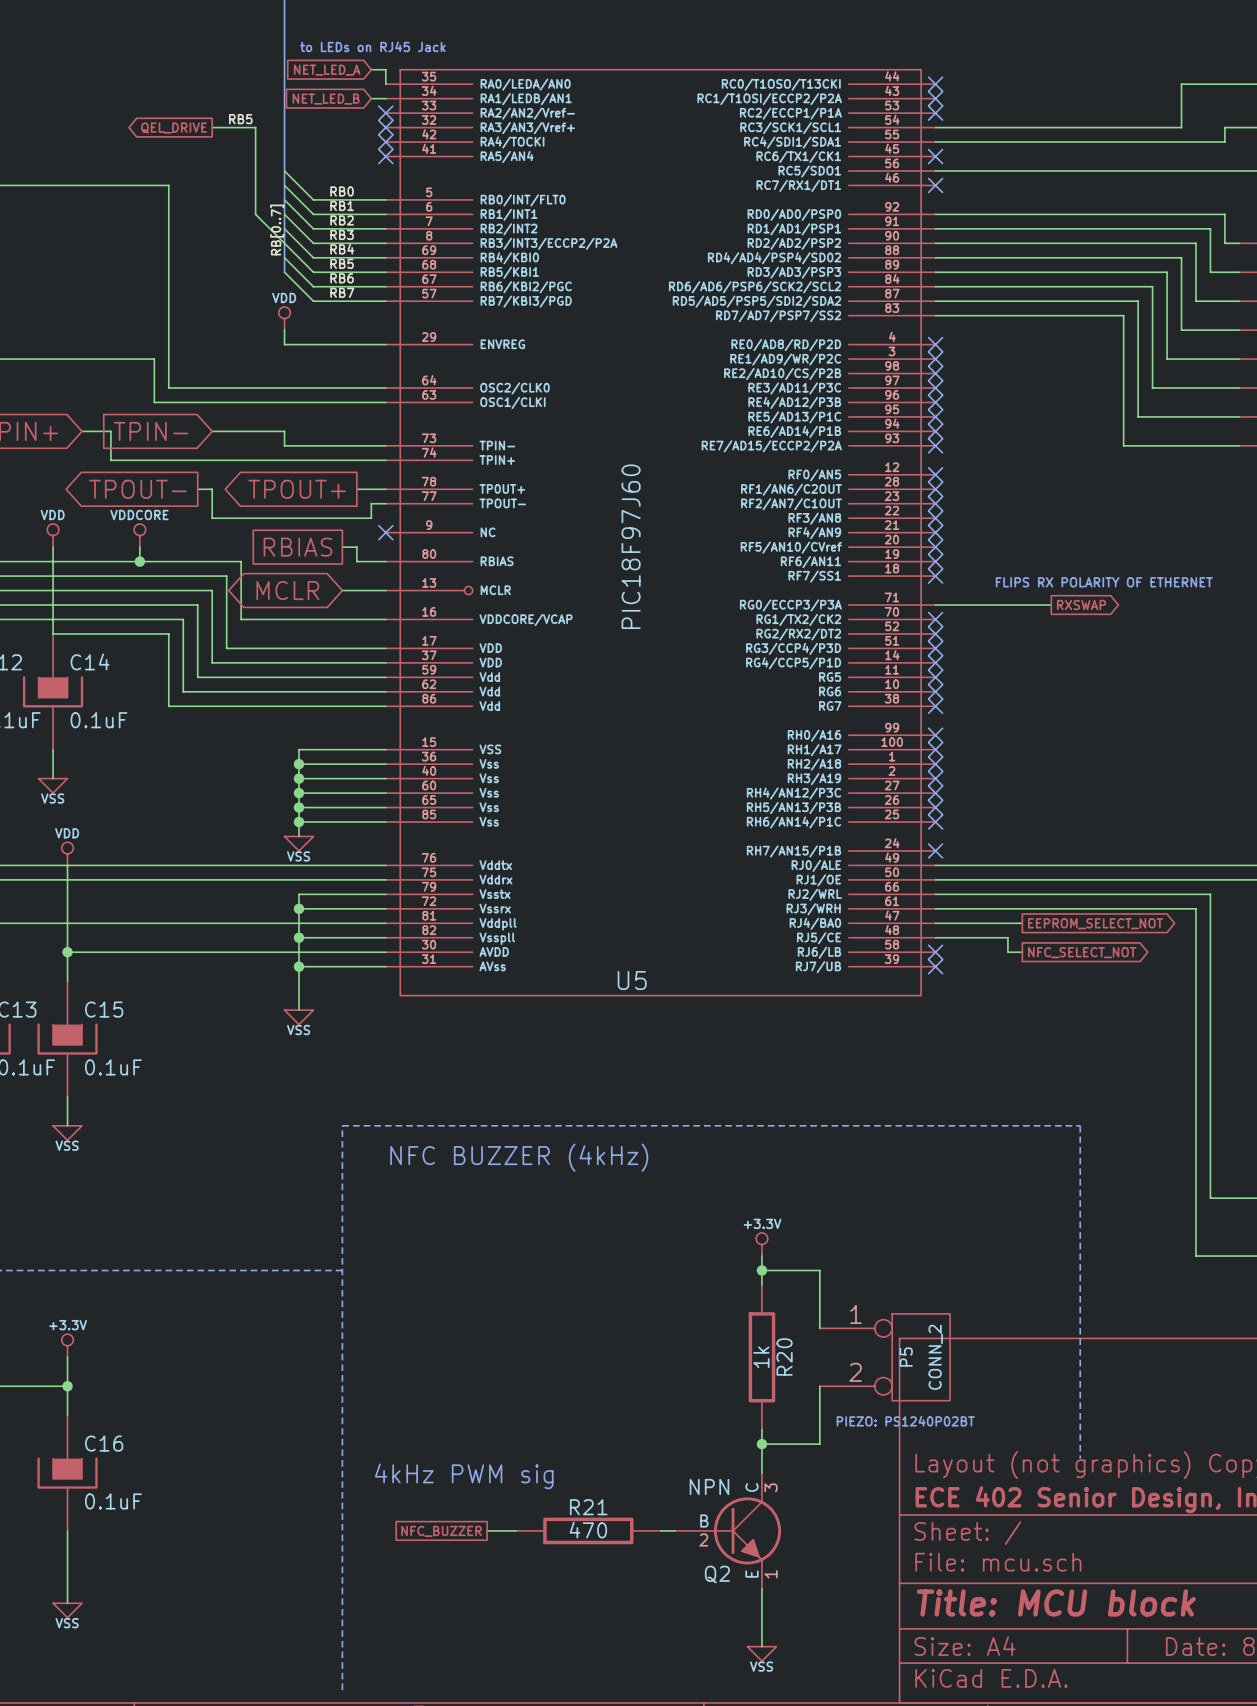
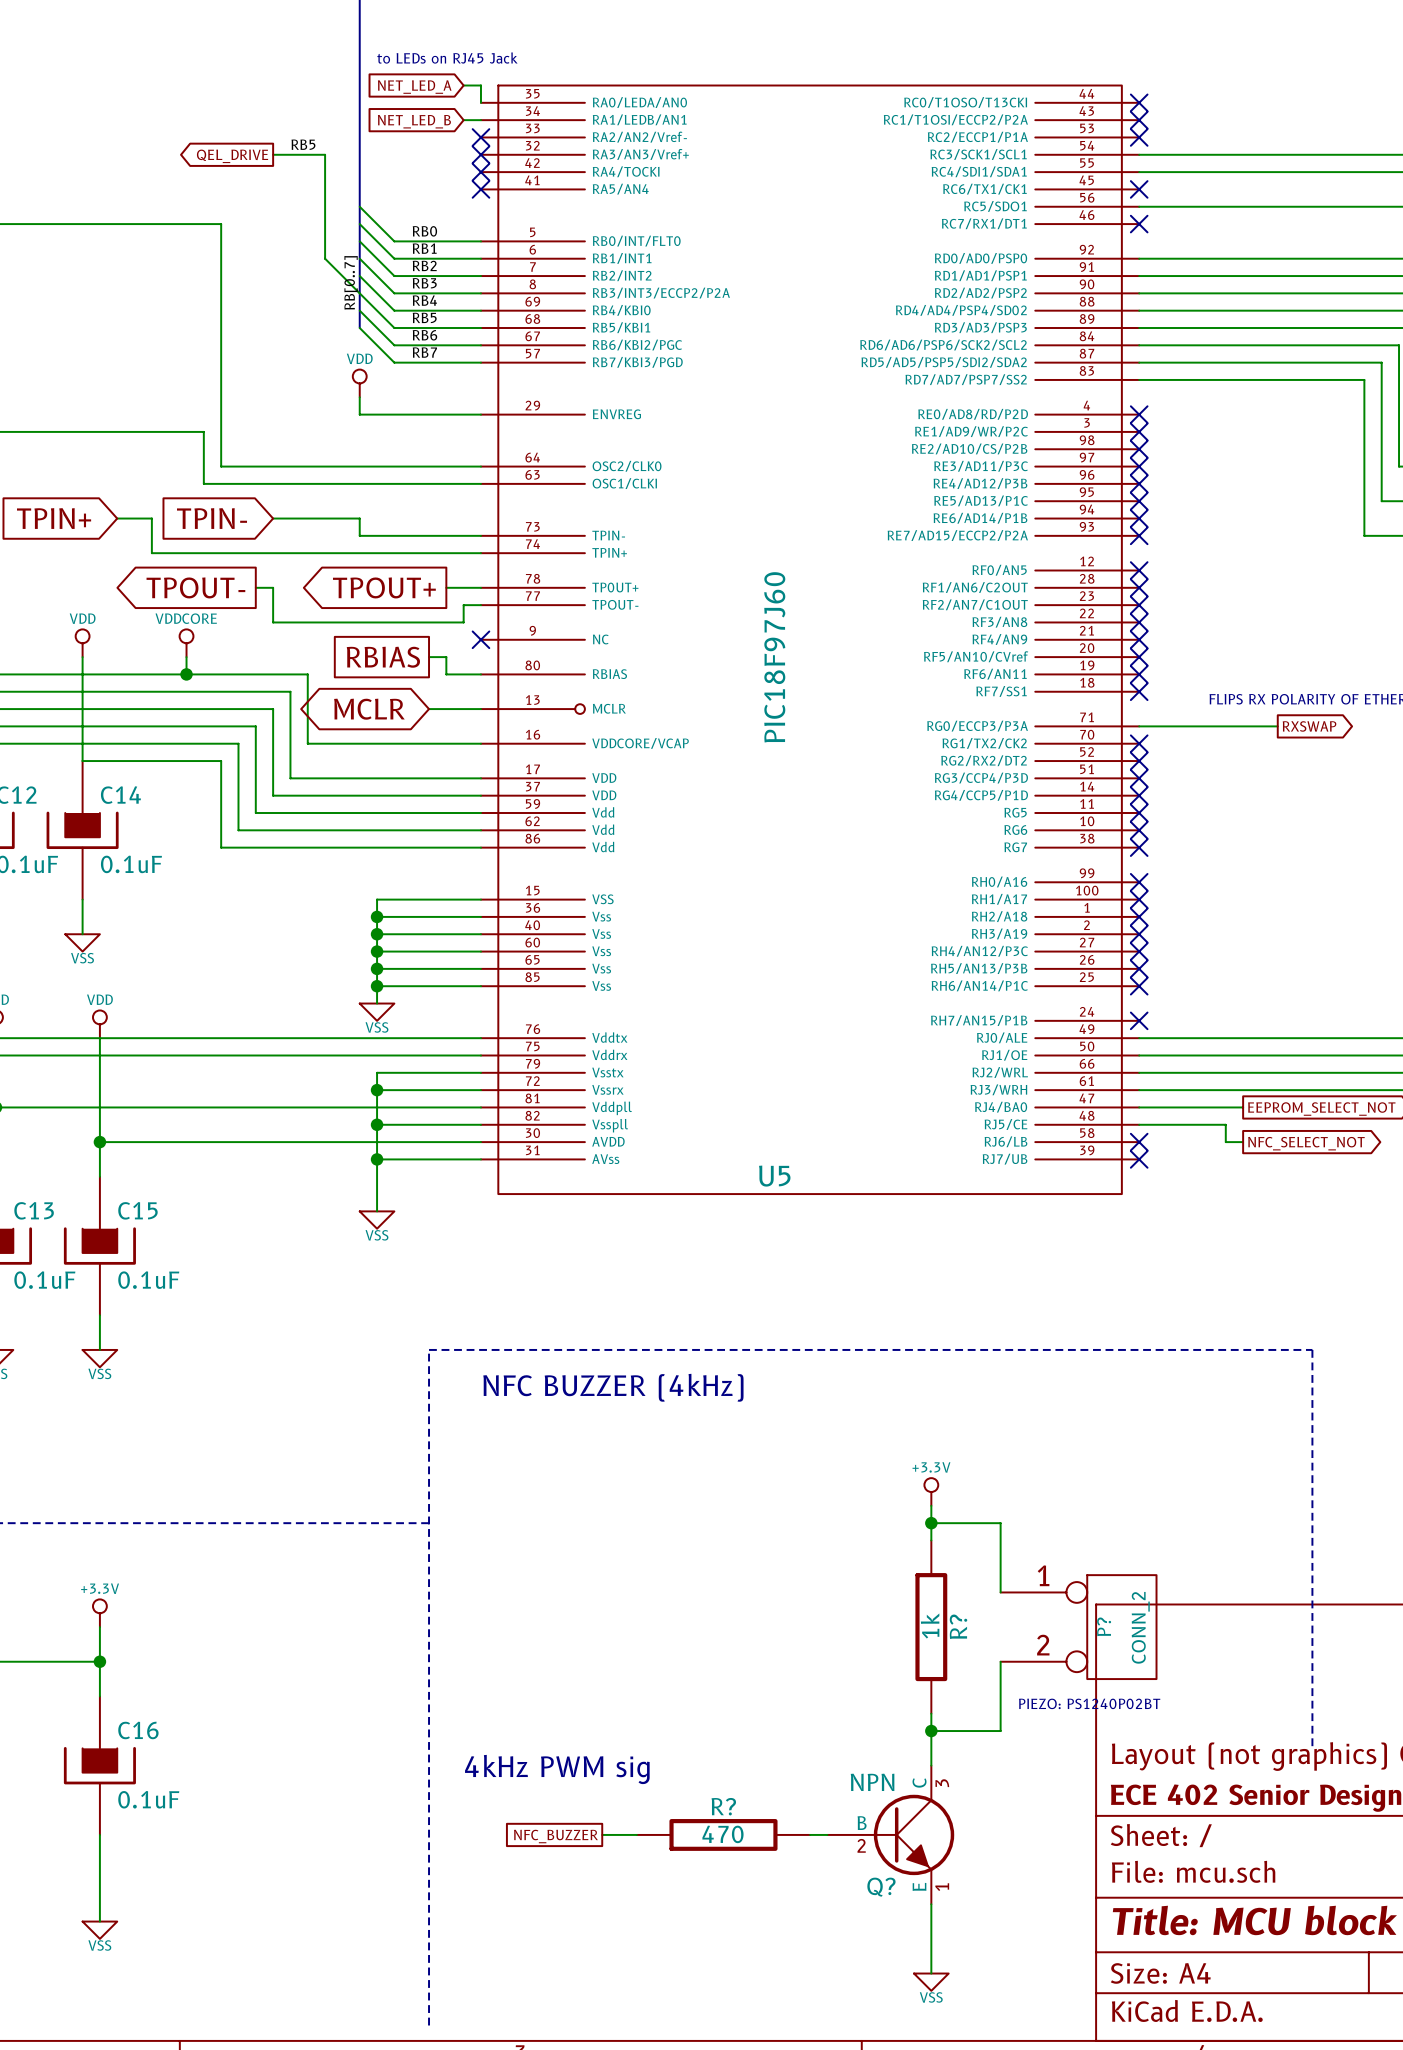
R20 name: R20 (784, 1356) -> R? (958, 1626)
P5 name: P5 (906, 1357) -> P? (1104, 1626)
R21 name: R21 (588, 1507) -> R? (723, 1806)
Q2 name: Q2 (717, 1574) -> Q? (881, 1887)

